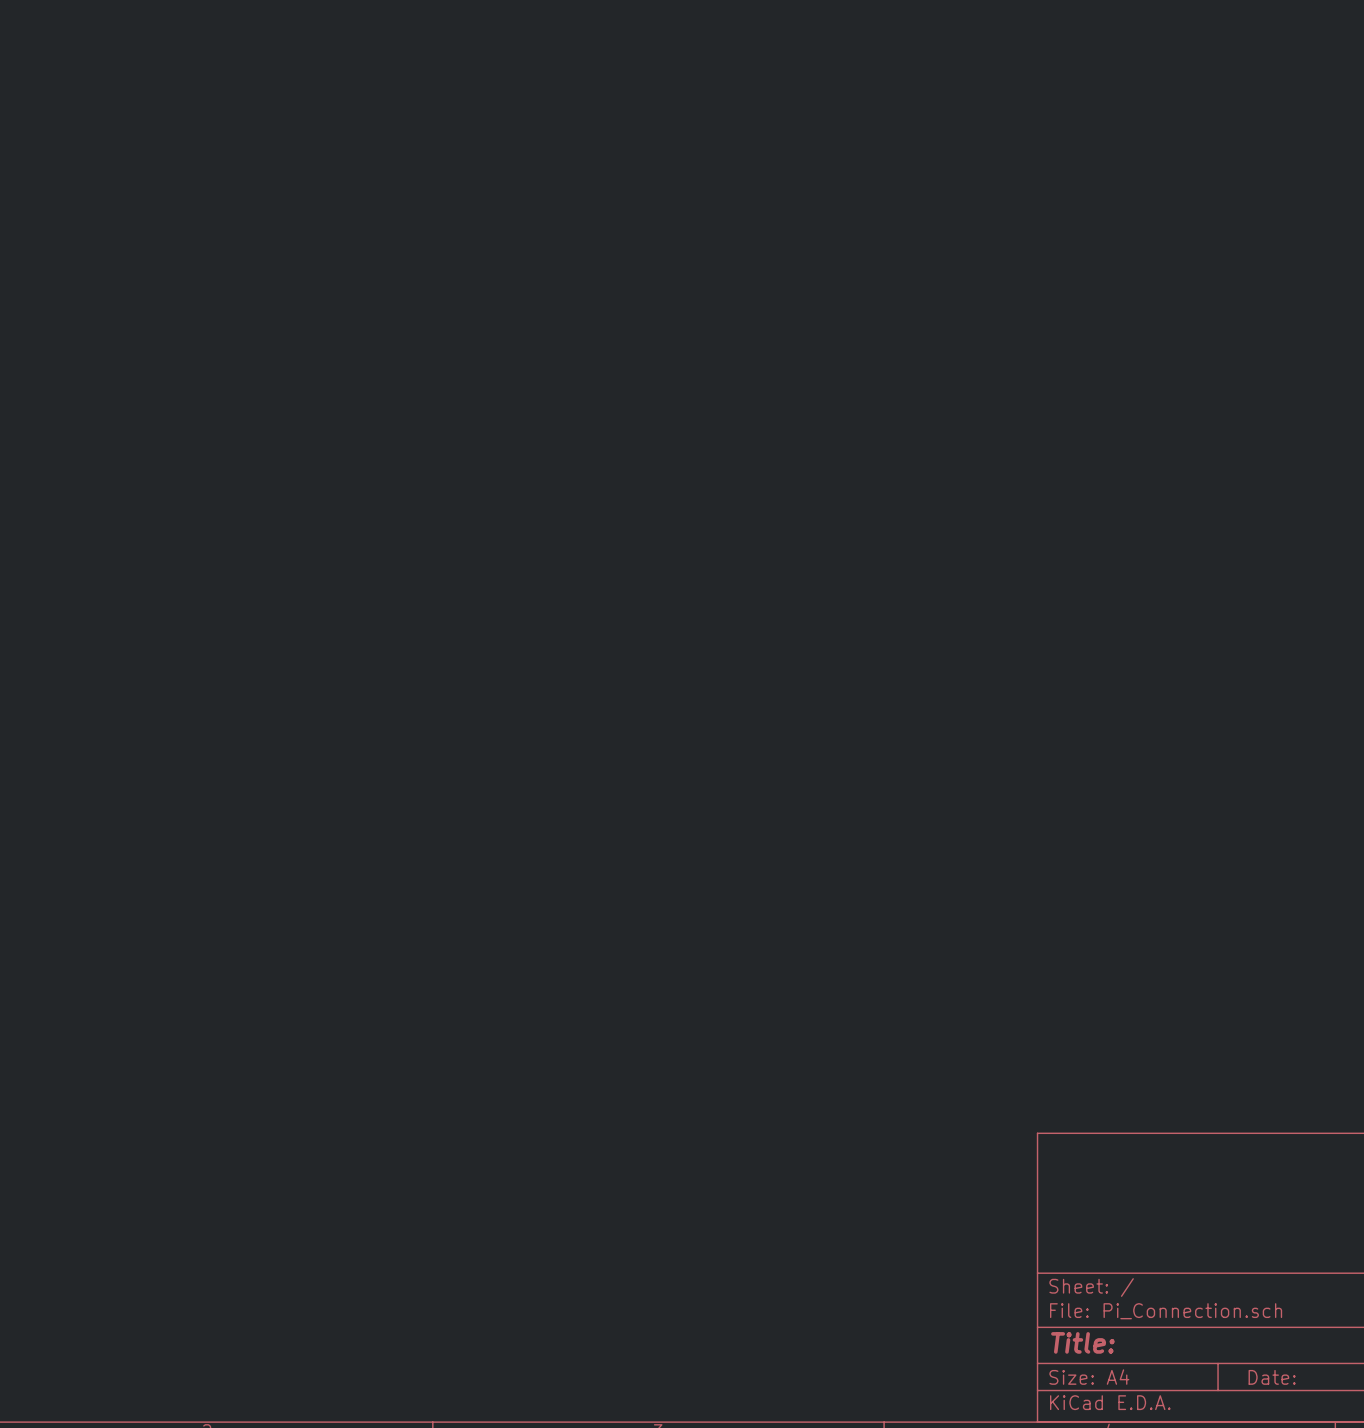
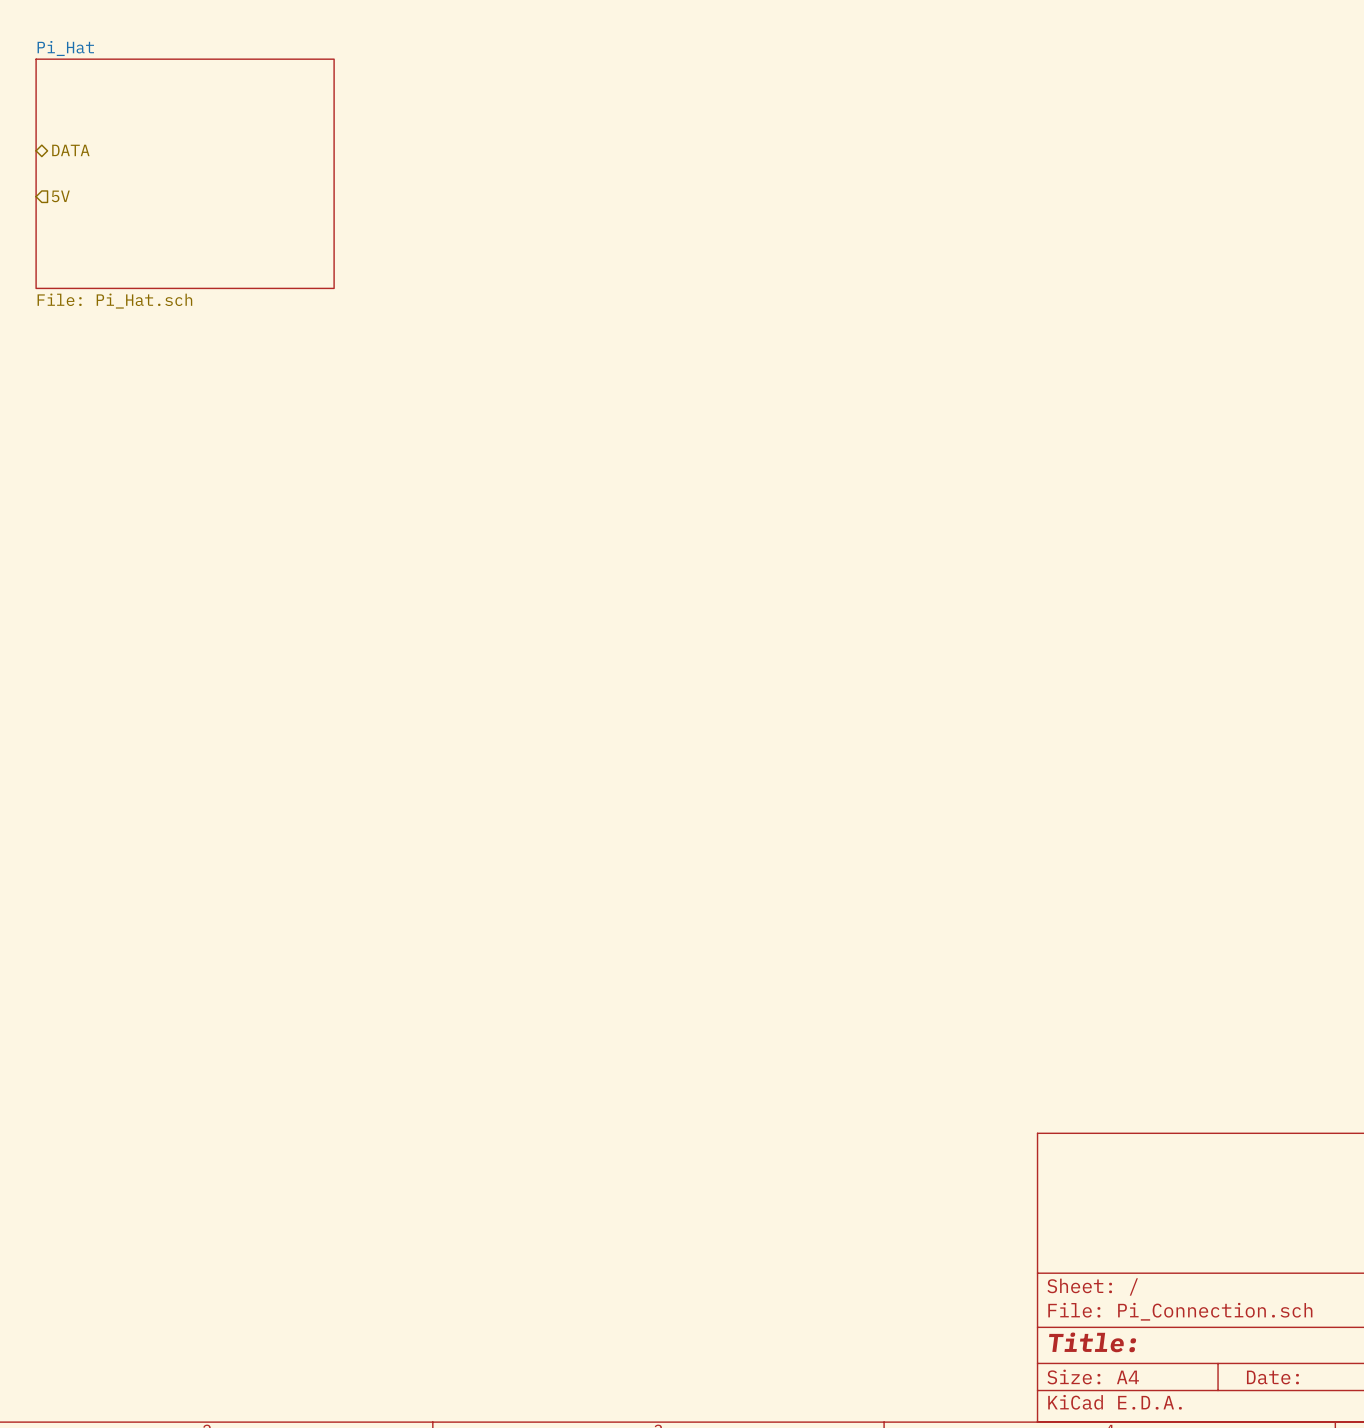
hierarchical label: none -> DATA (70, 150)
sheet Pi_Hat: none -> File: Pi_Hat.sch (185, 173)
hierarchical label: none -> 5V (60, 196)

